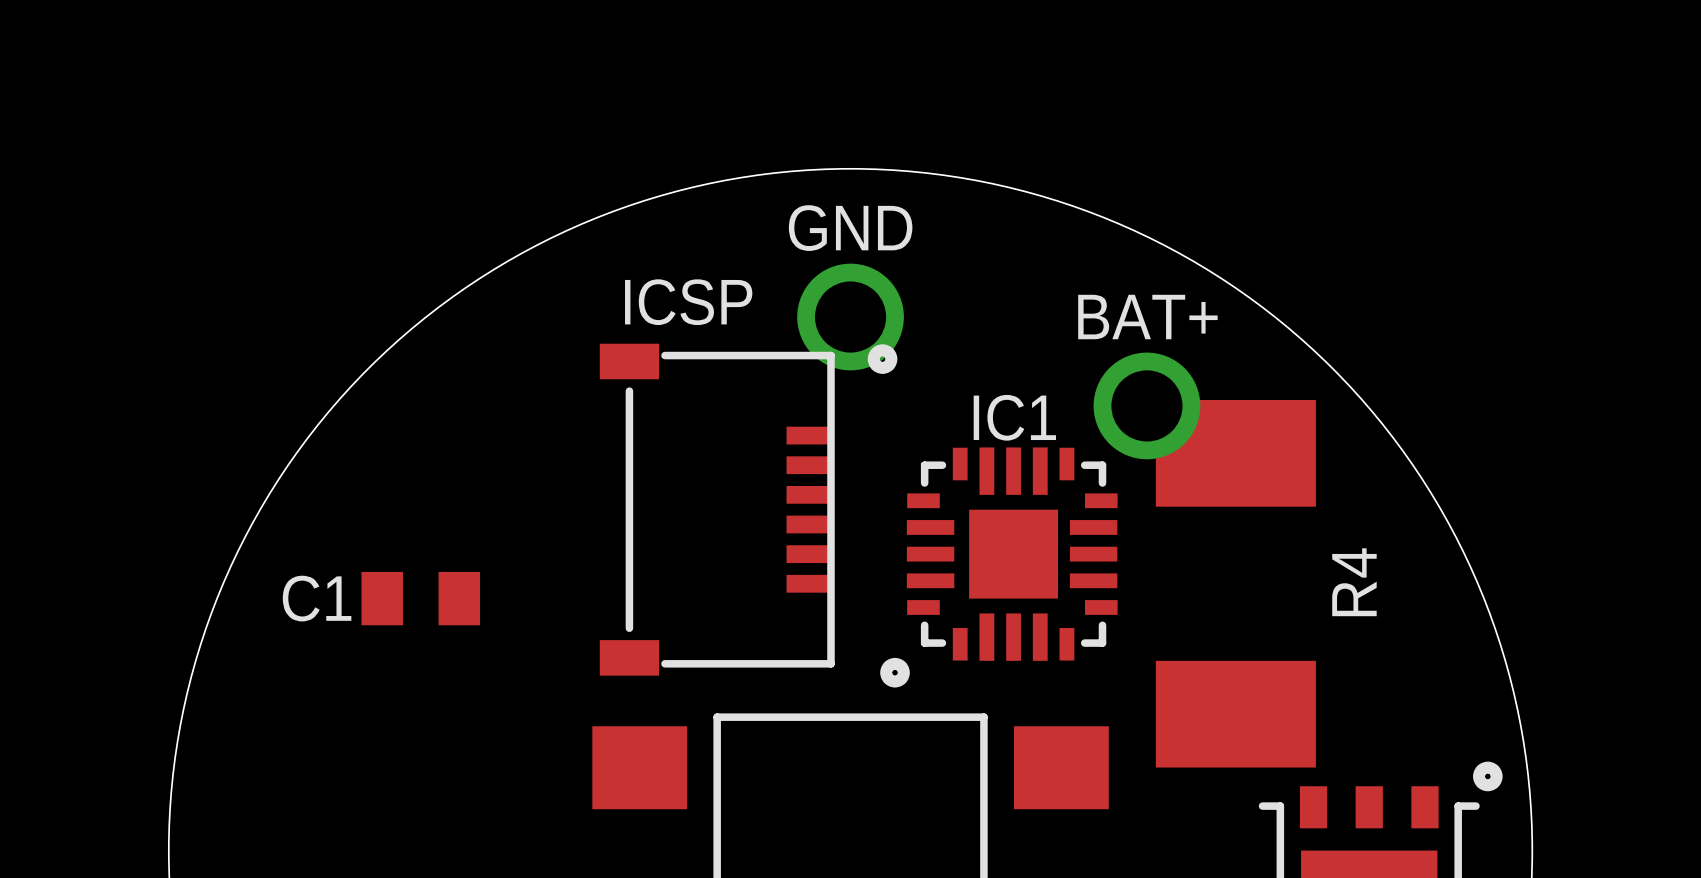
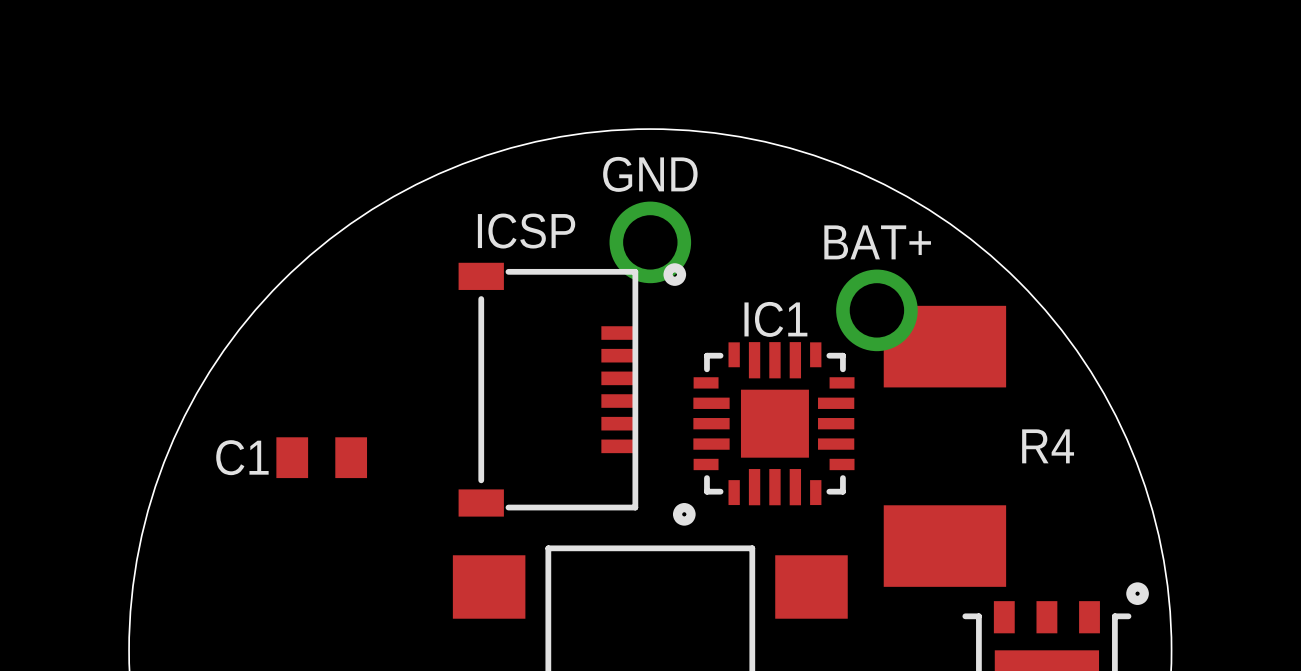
R4 name rotation: 0° (1354, 582) -> 90° clockwise (1048, 446)

